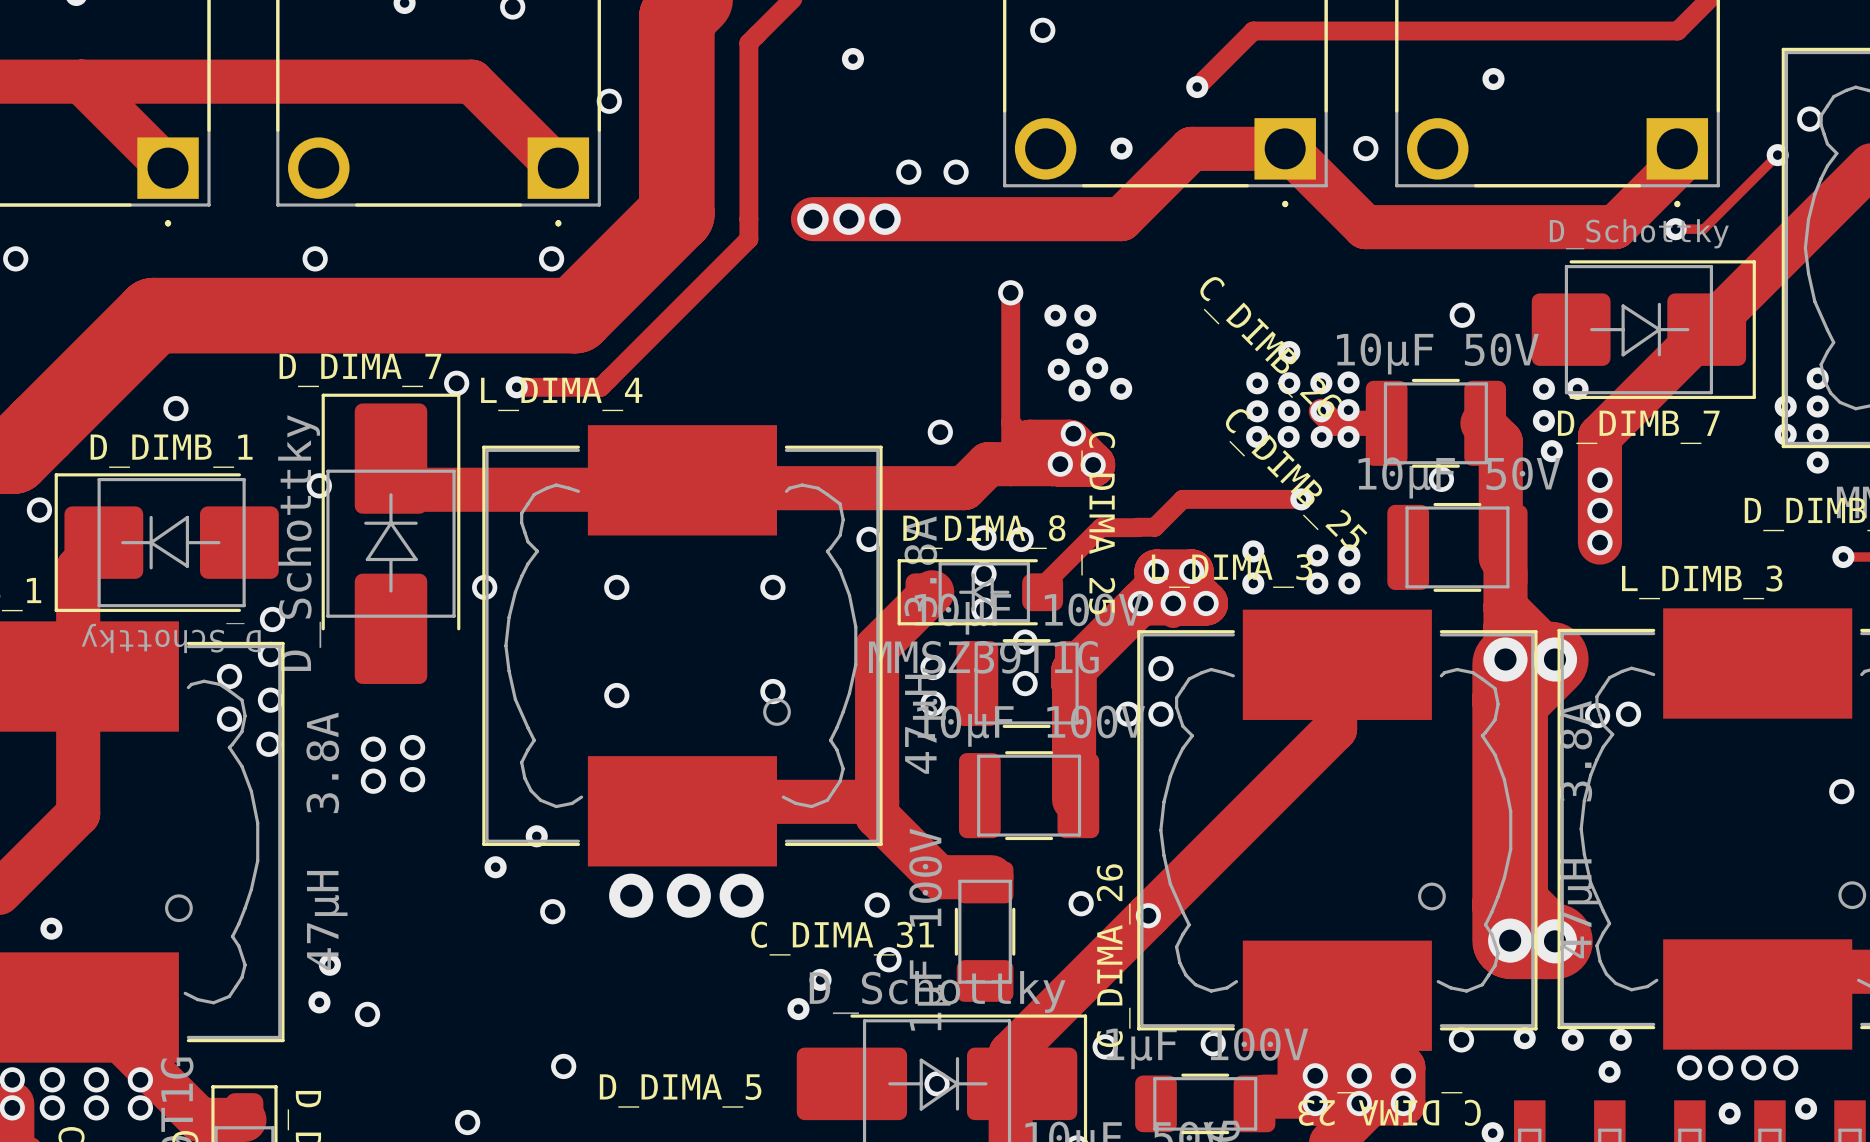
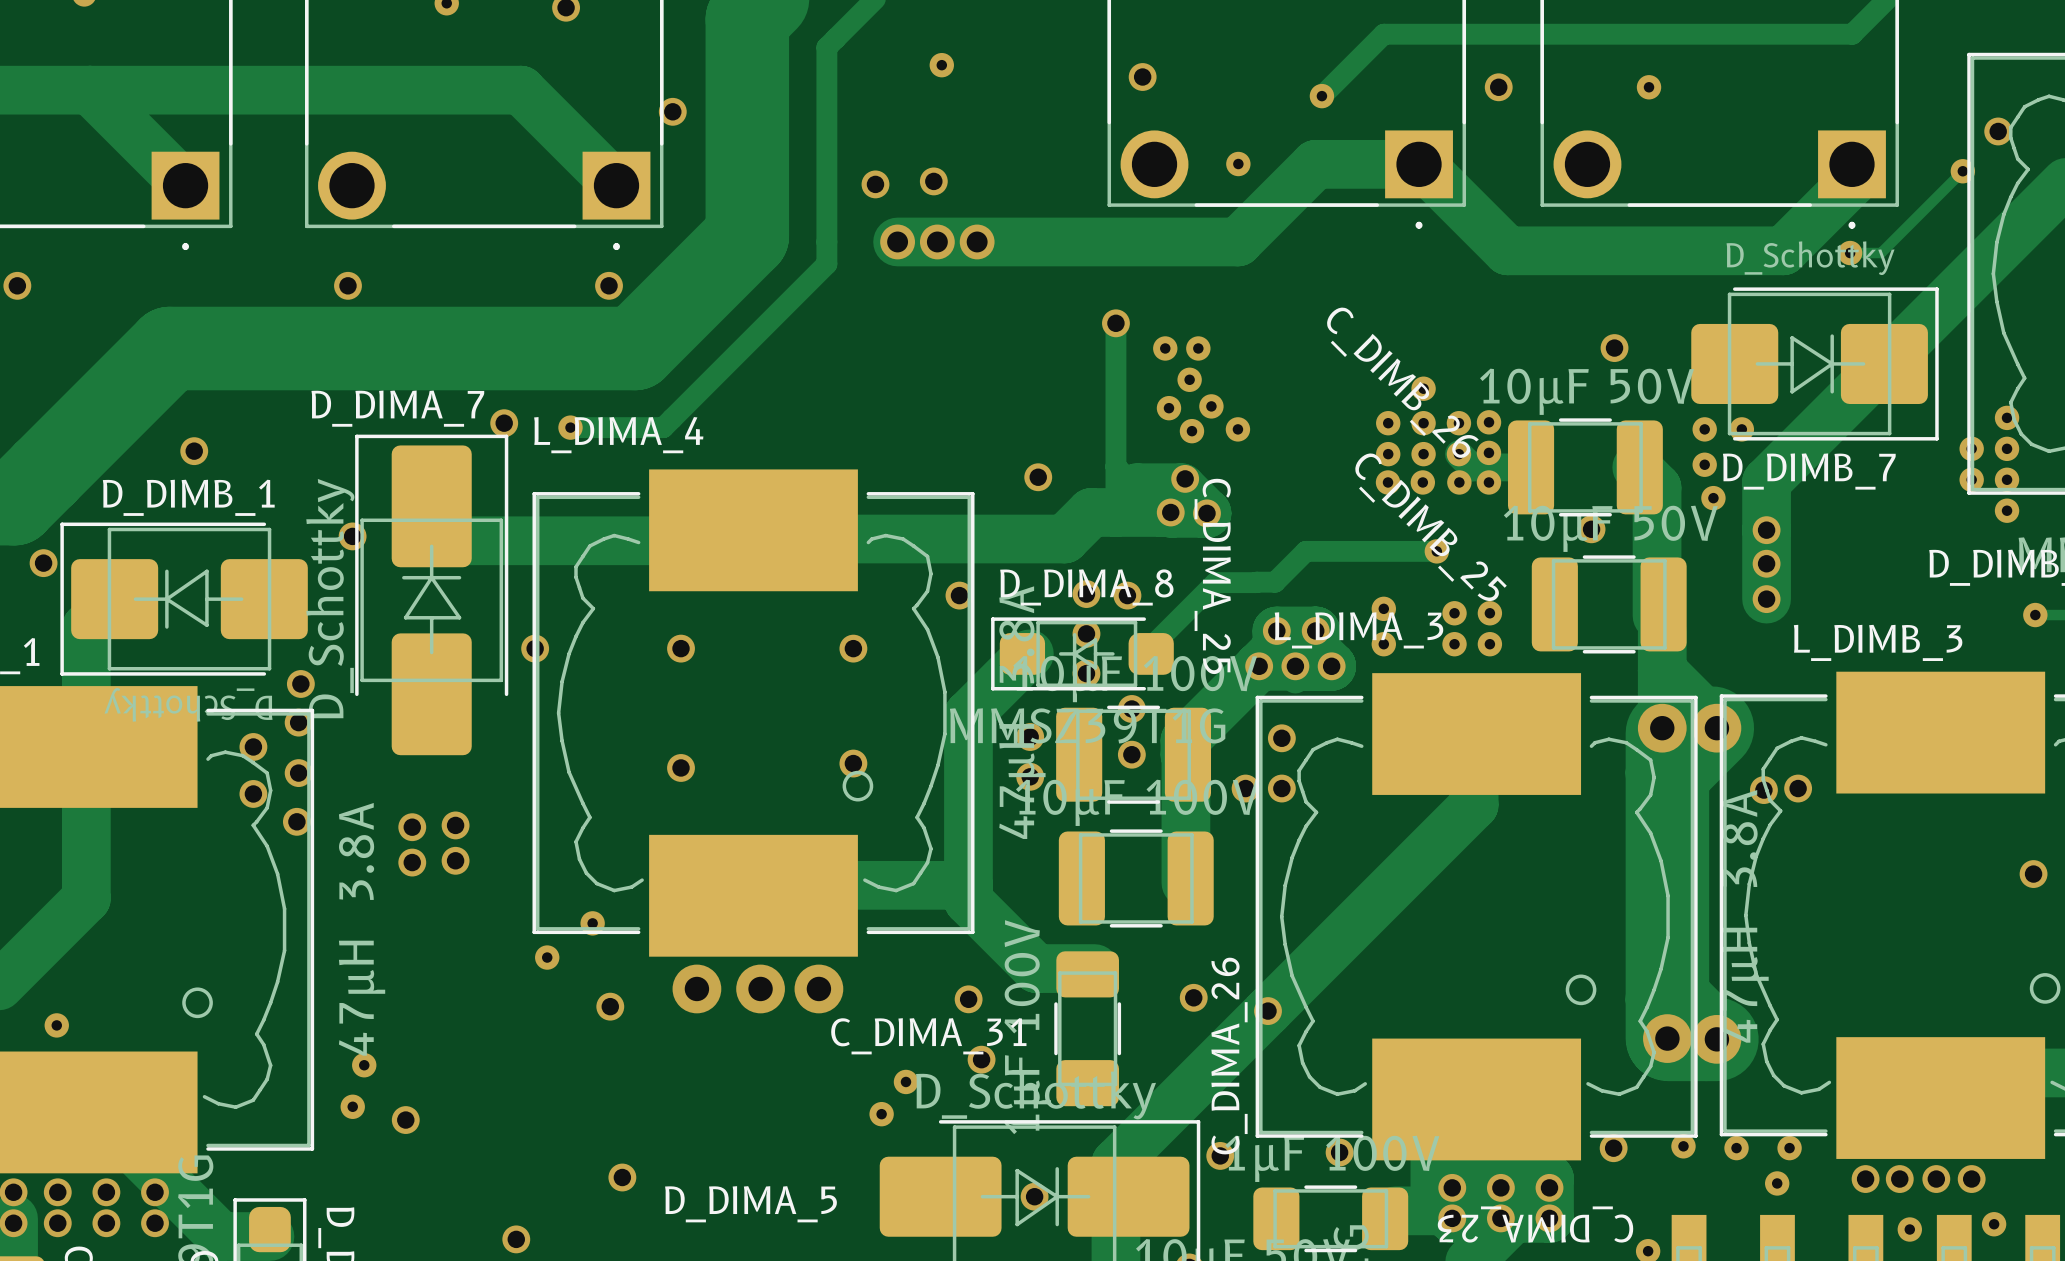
via position: (1042, 30) -> (1142, 77)
via position: (1365, 148) -> (1498, 87)
via: none -> (933, 181)
via: none -> (875, 184)
via: (908, 172) -> none
via: (956, 172) -> none

